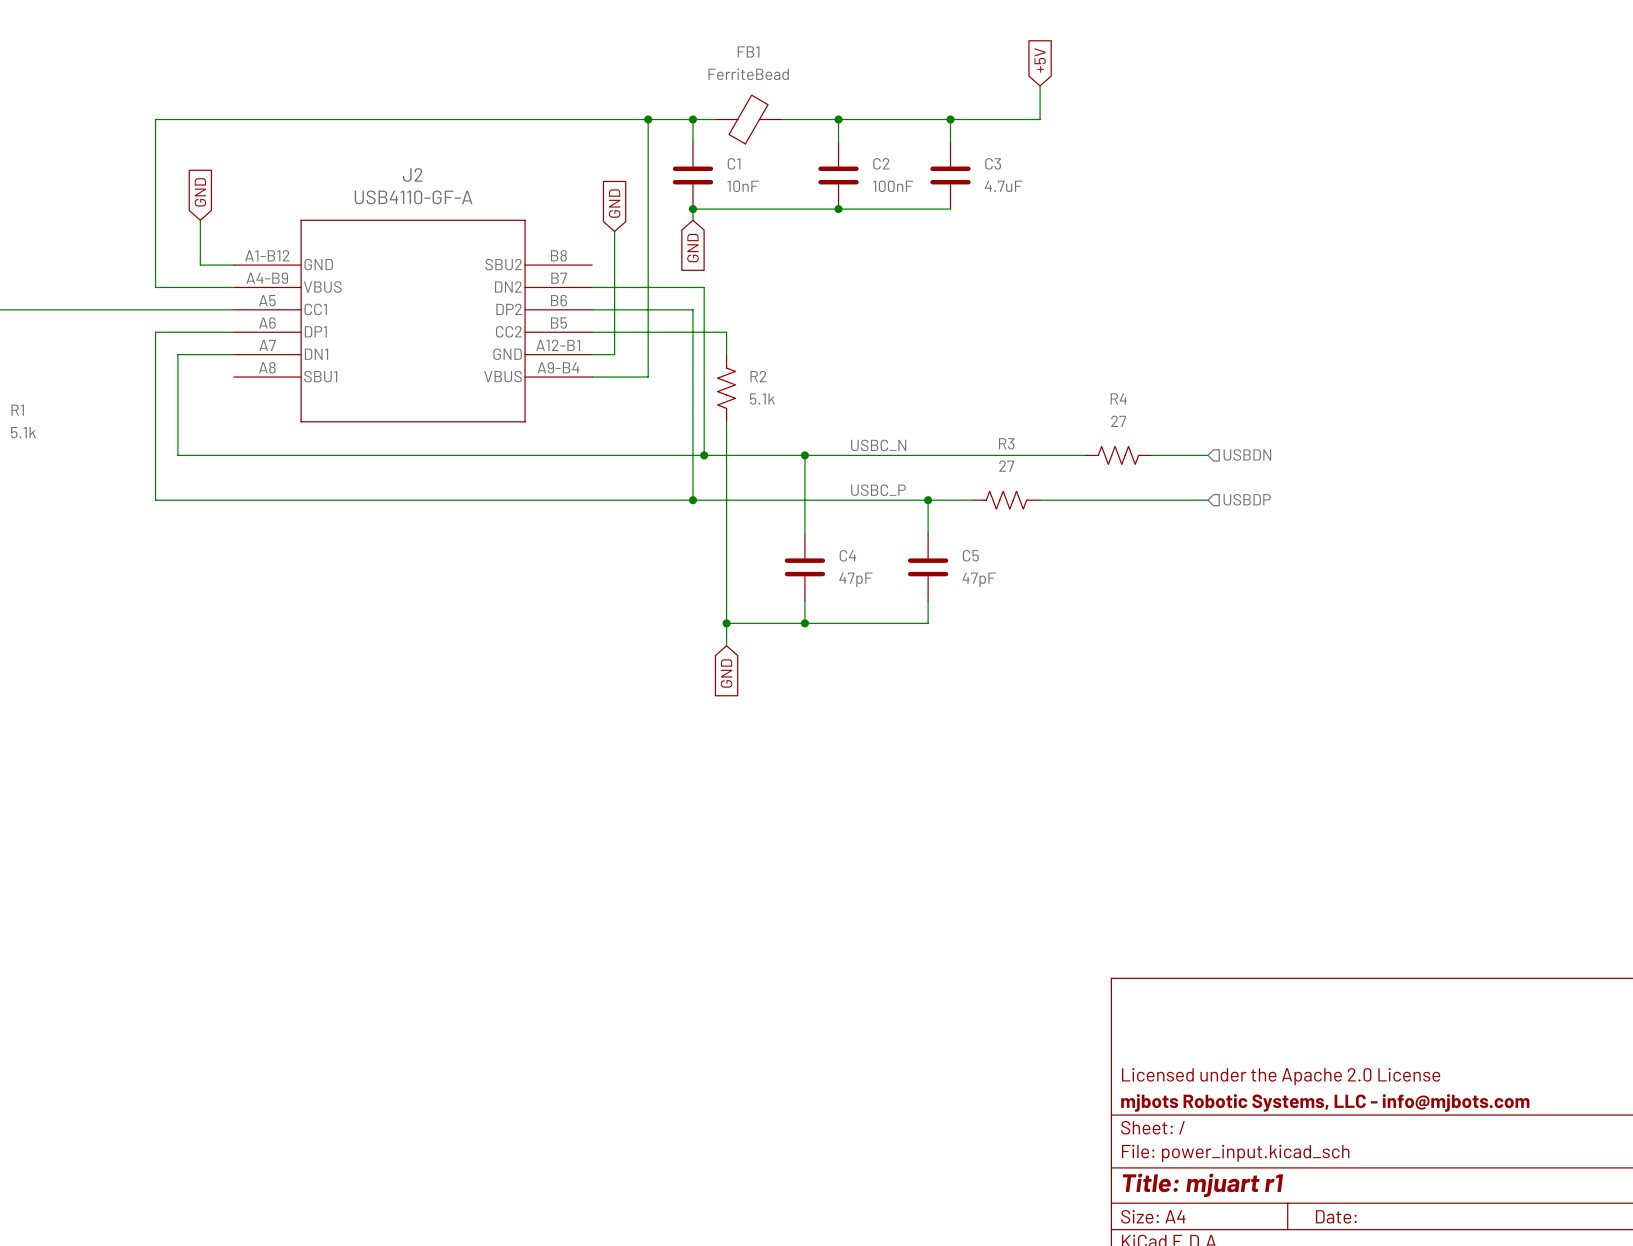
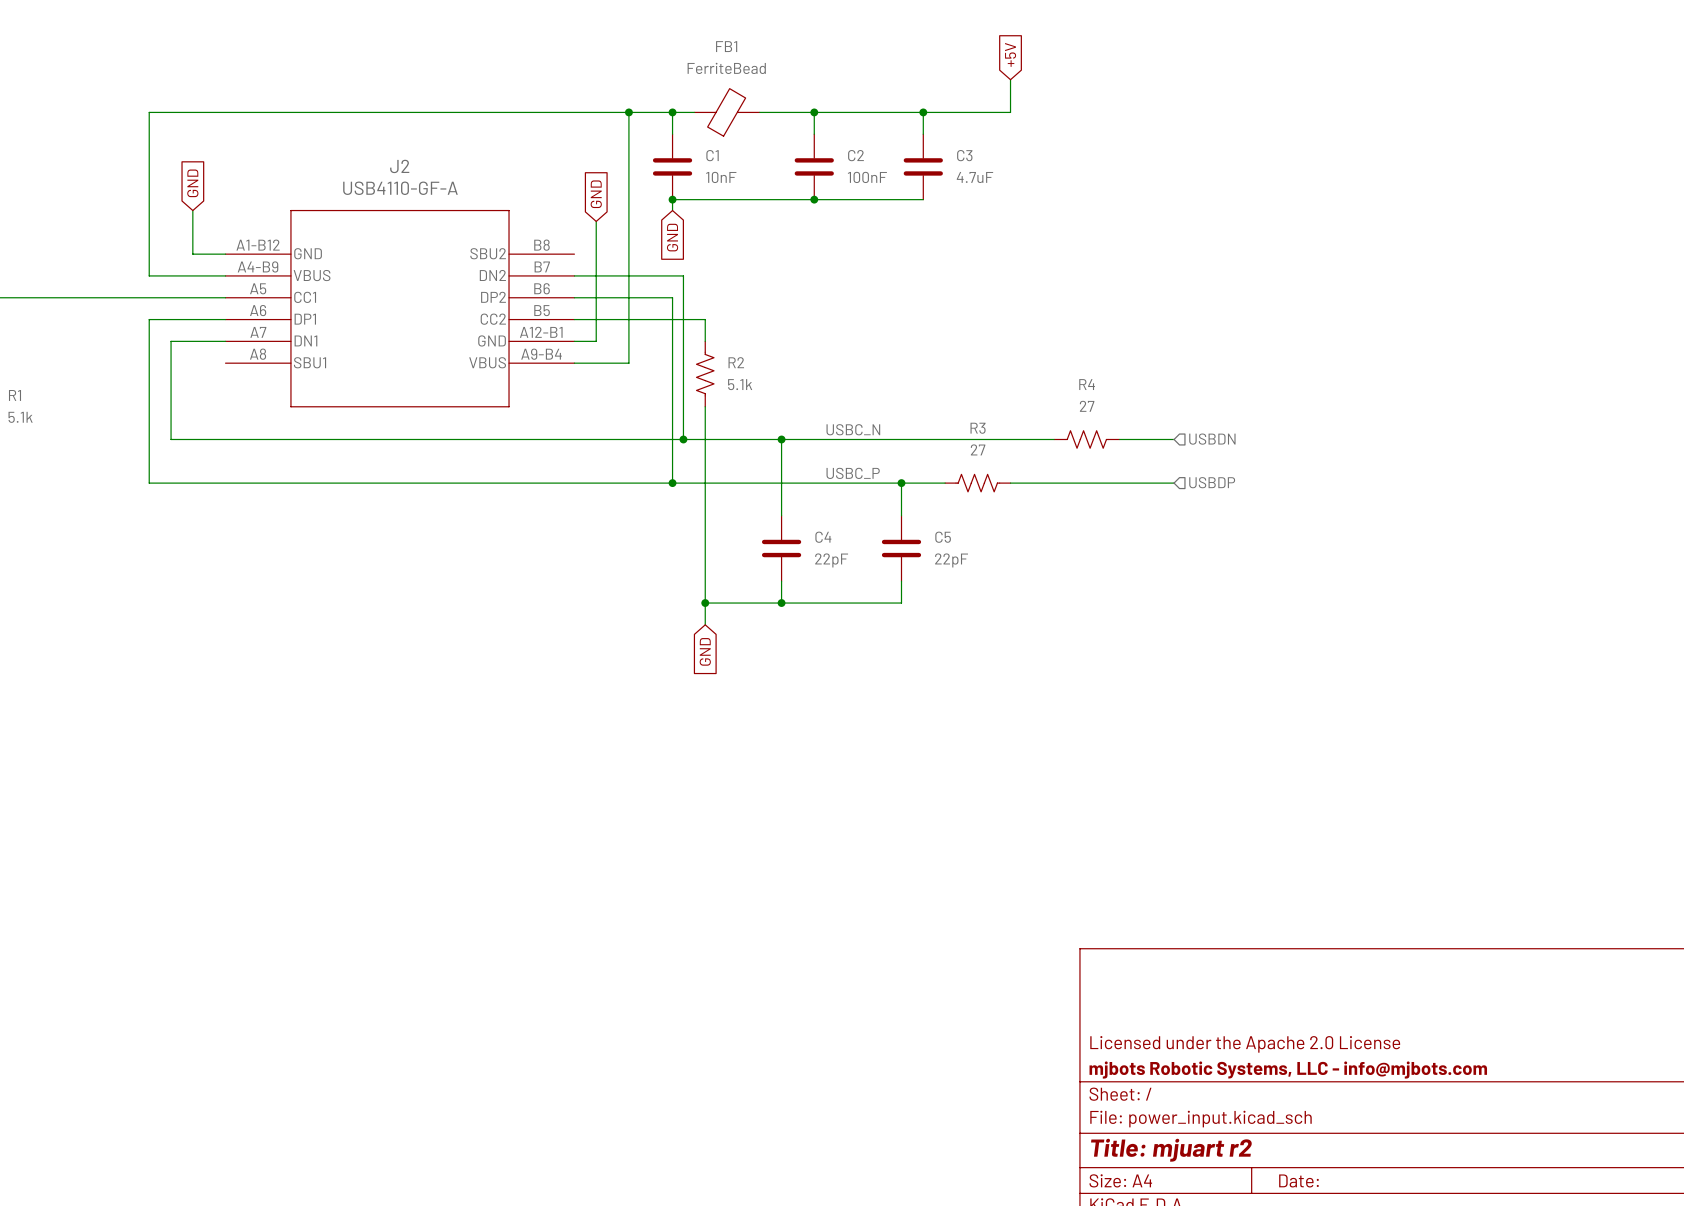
C4 value: 47pF (855, 579) -> 22pF (831, 560)
C5 value: 47pF (979, 579) -> 22pF (951, 560)
title block: Title: mjuart r1 (1202, 1185) -> Title: mjuart r2 (1171, 1150)

